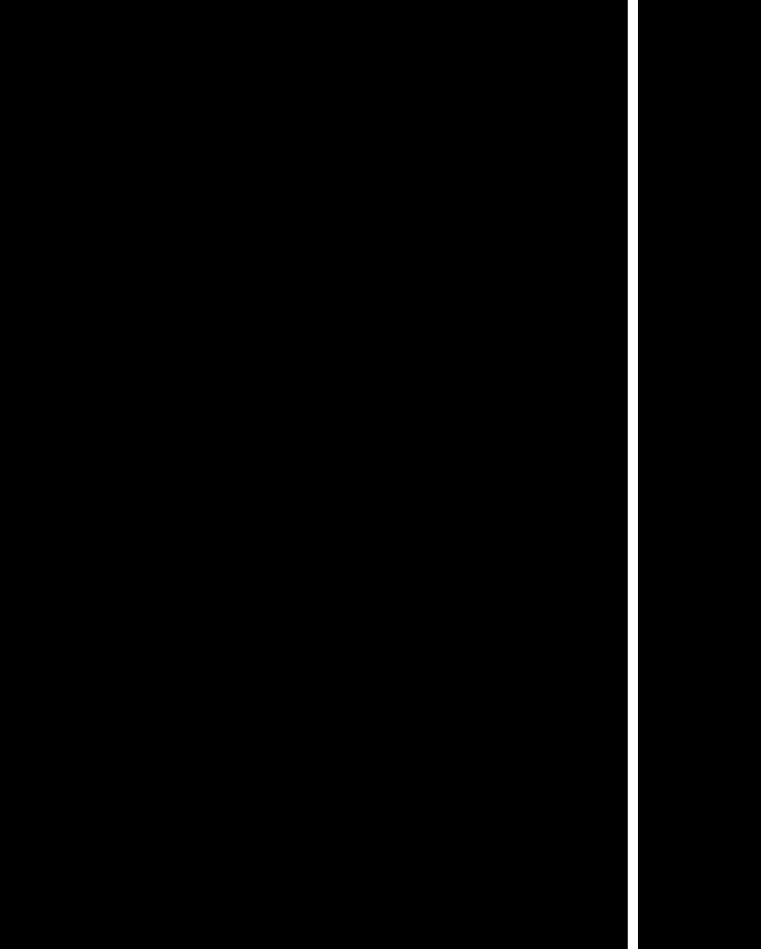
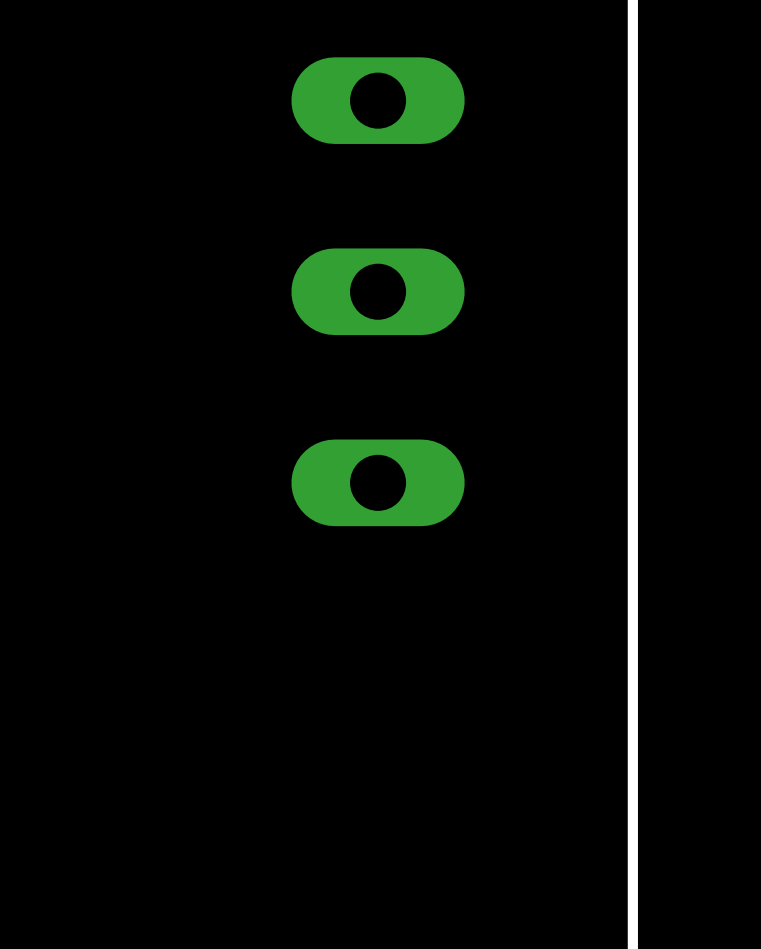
part: none -> (378, 291)

